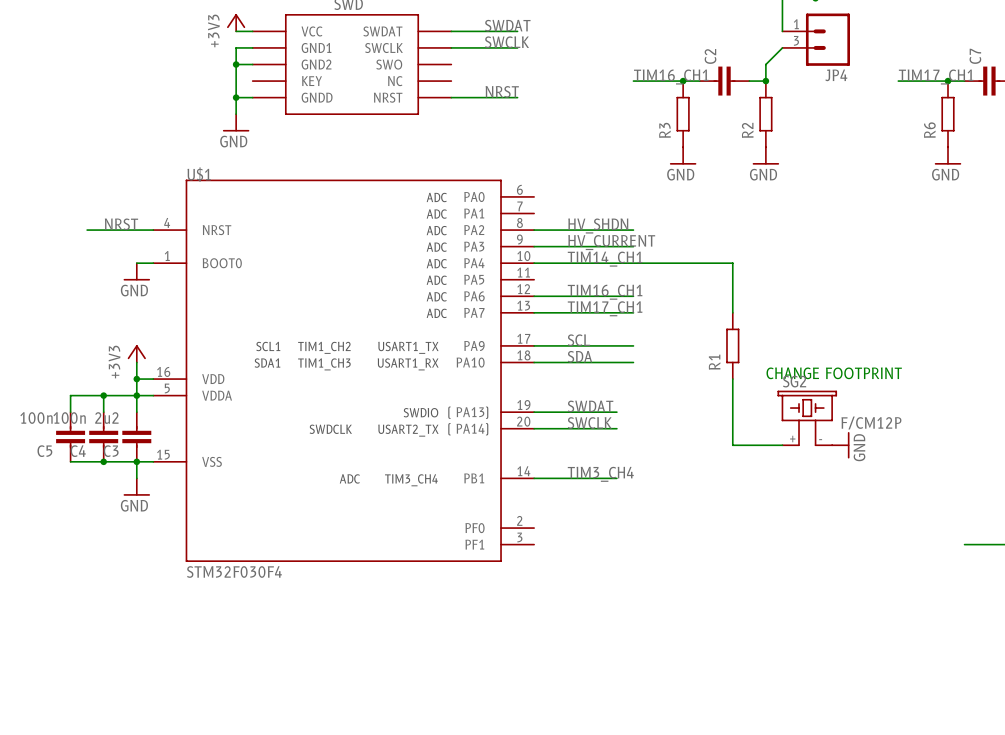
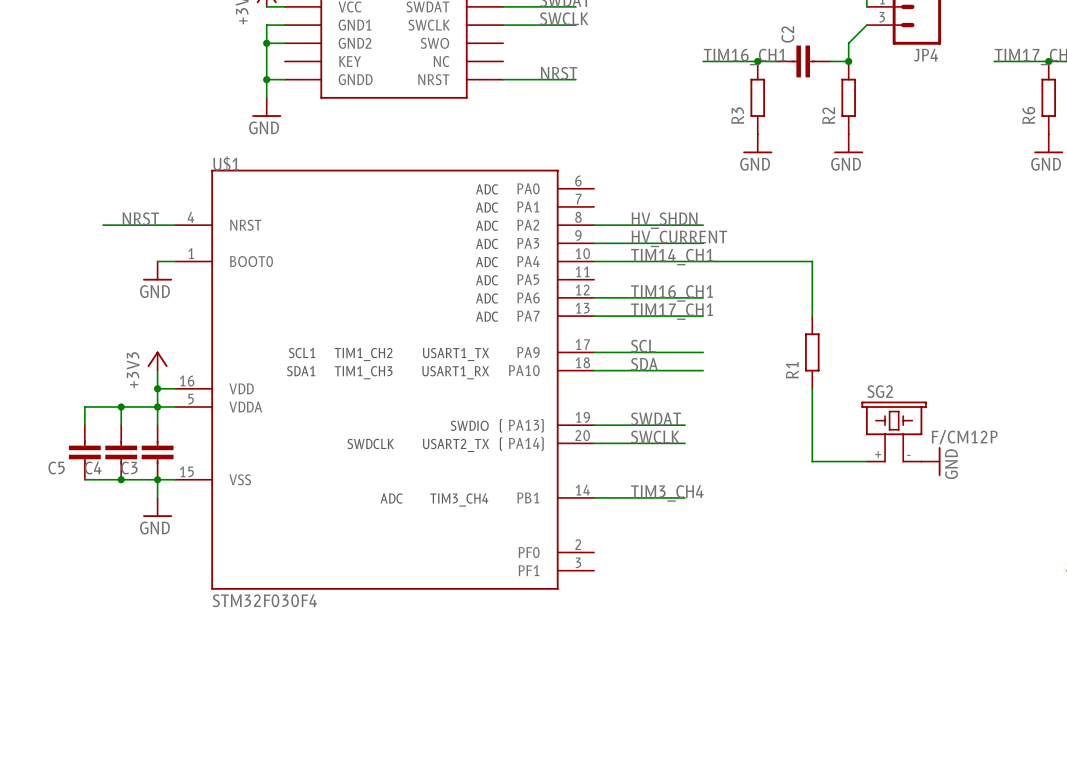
text: CHANGE FOOTPRINT (834, 373) -> none
C5 value: 100n (36, 418) -> none
C4 value: 100n (69, 418) -> none
C3 value: 2u2 (106, 418) -> none

